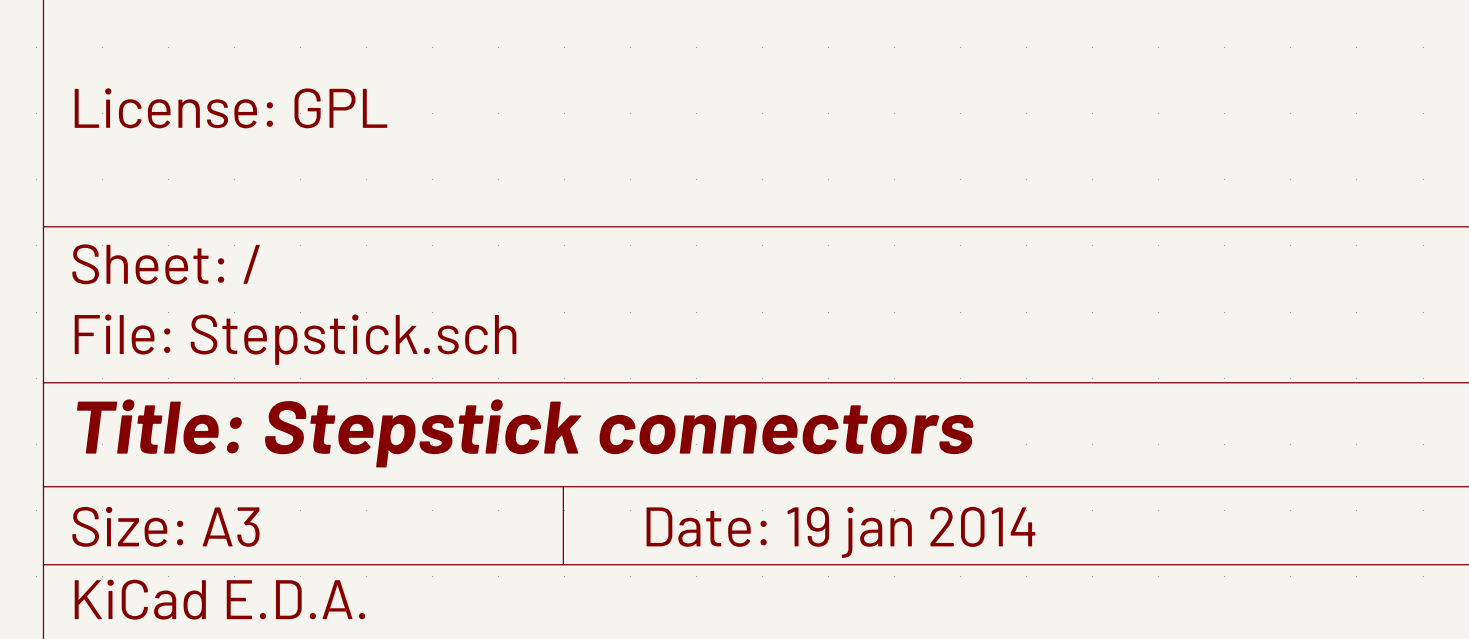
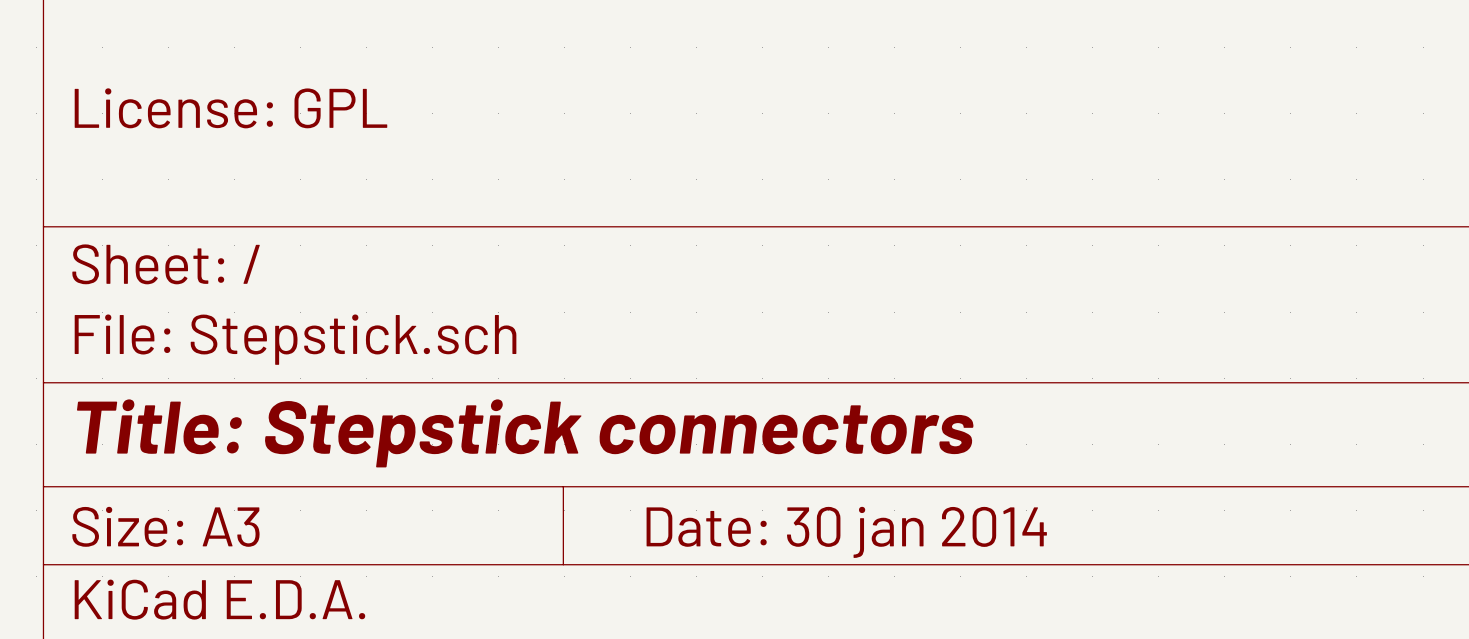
title block: Date: 19 jan 2014 (840, 532) -> Date: 30 jan 2014 (846, 532)

